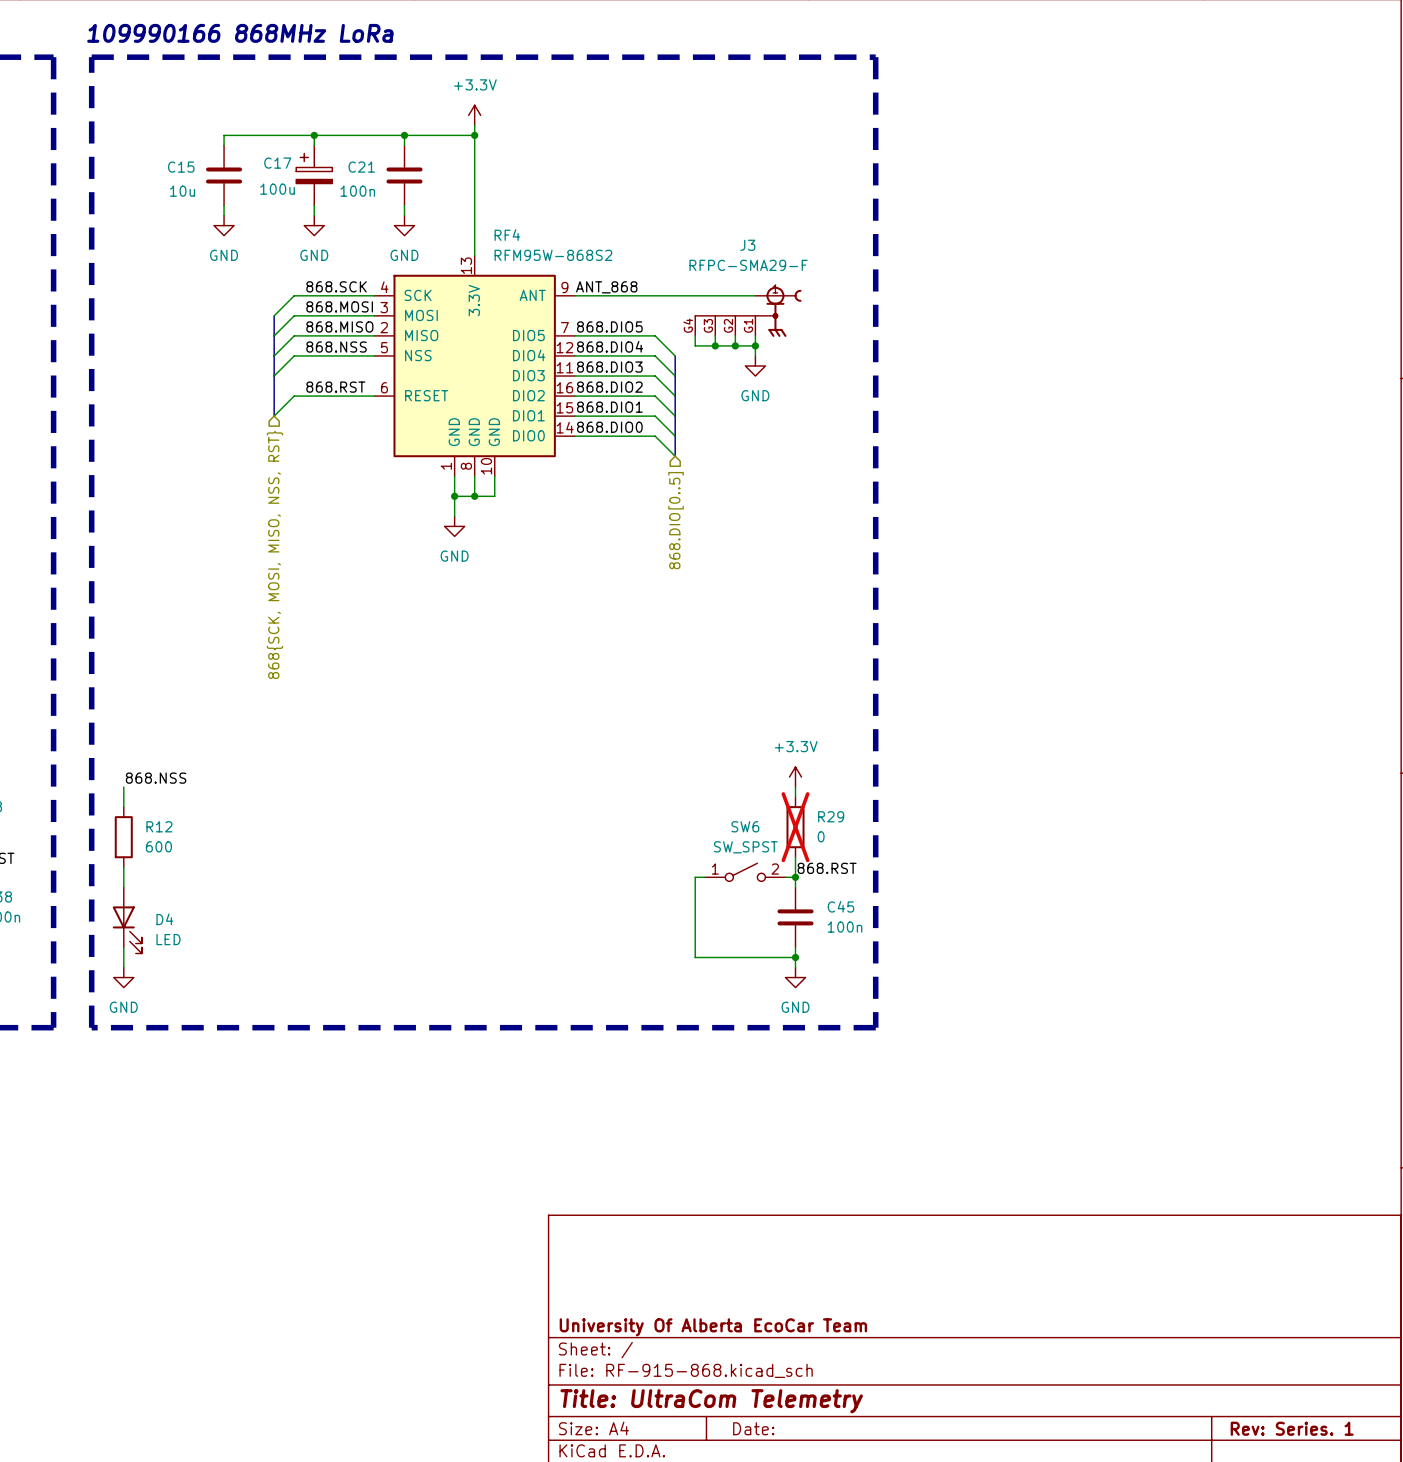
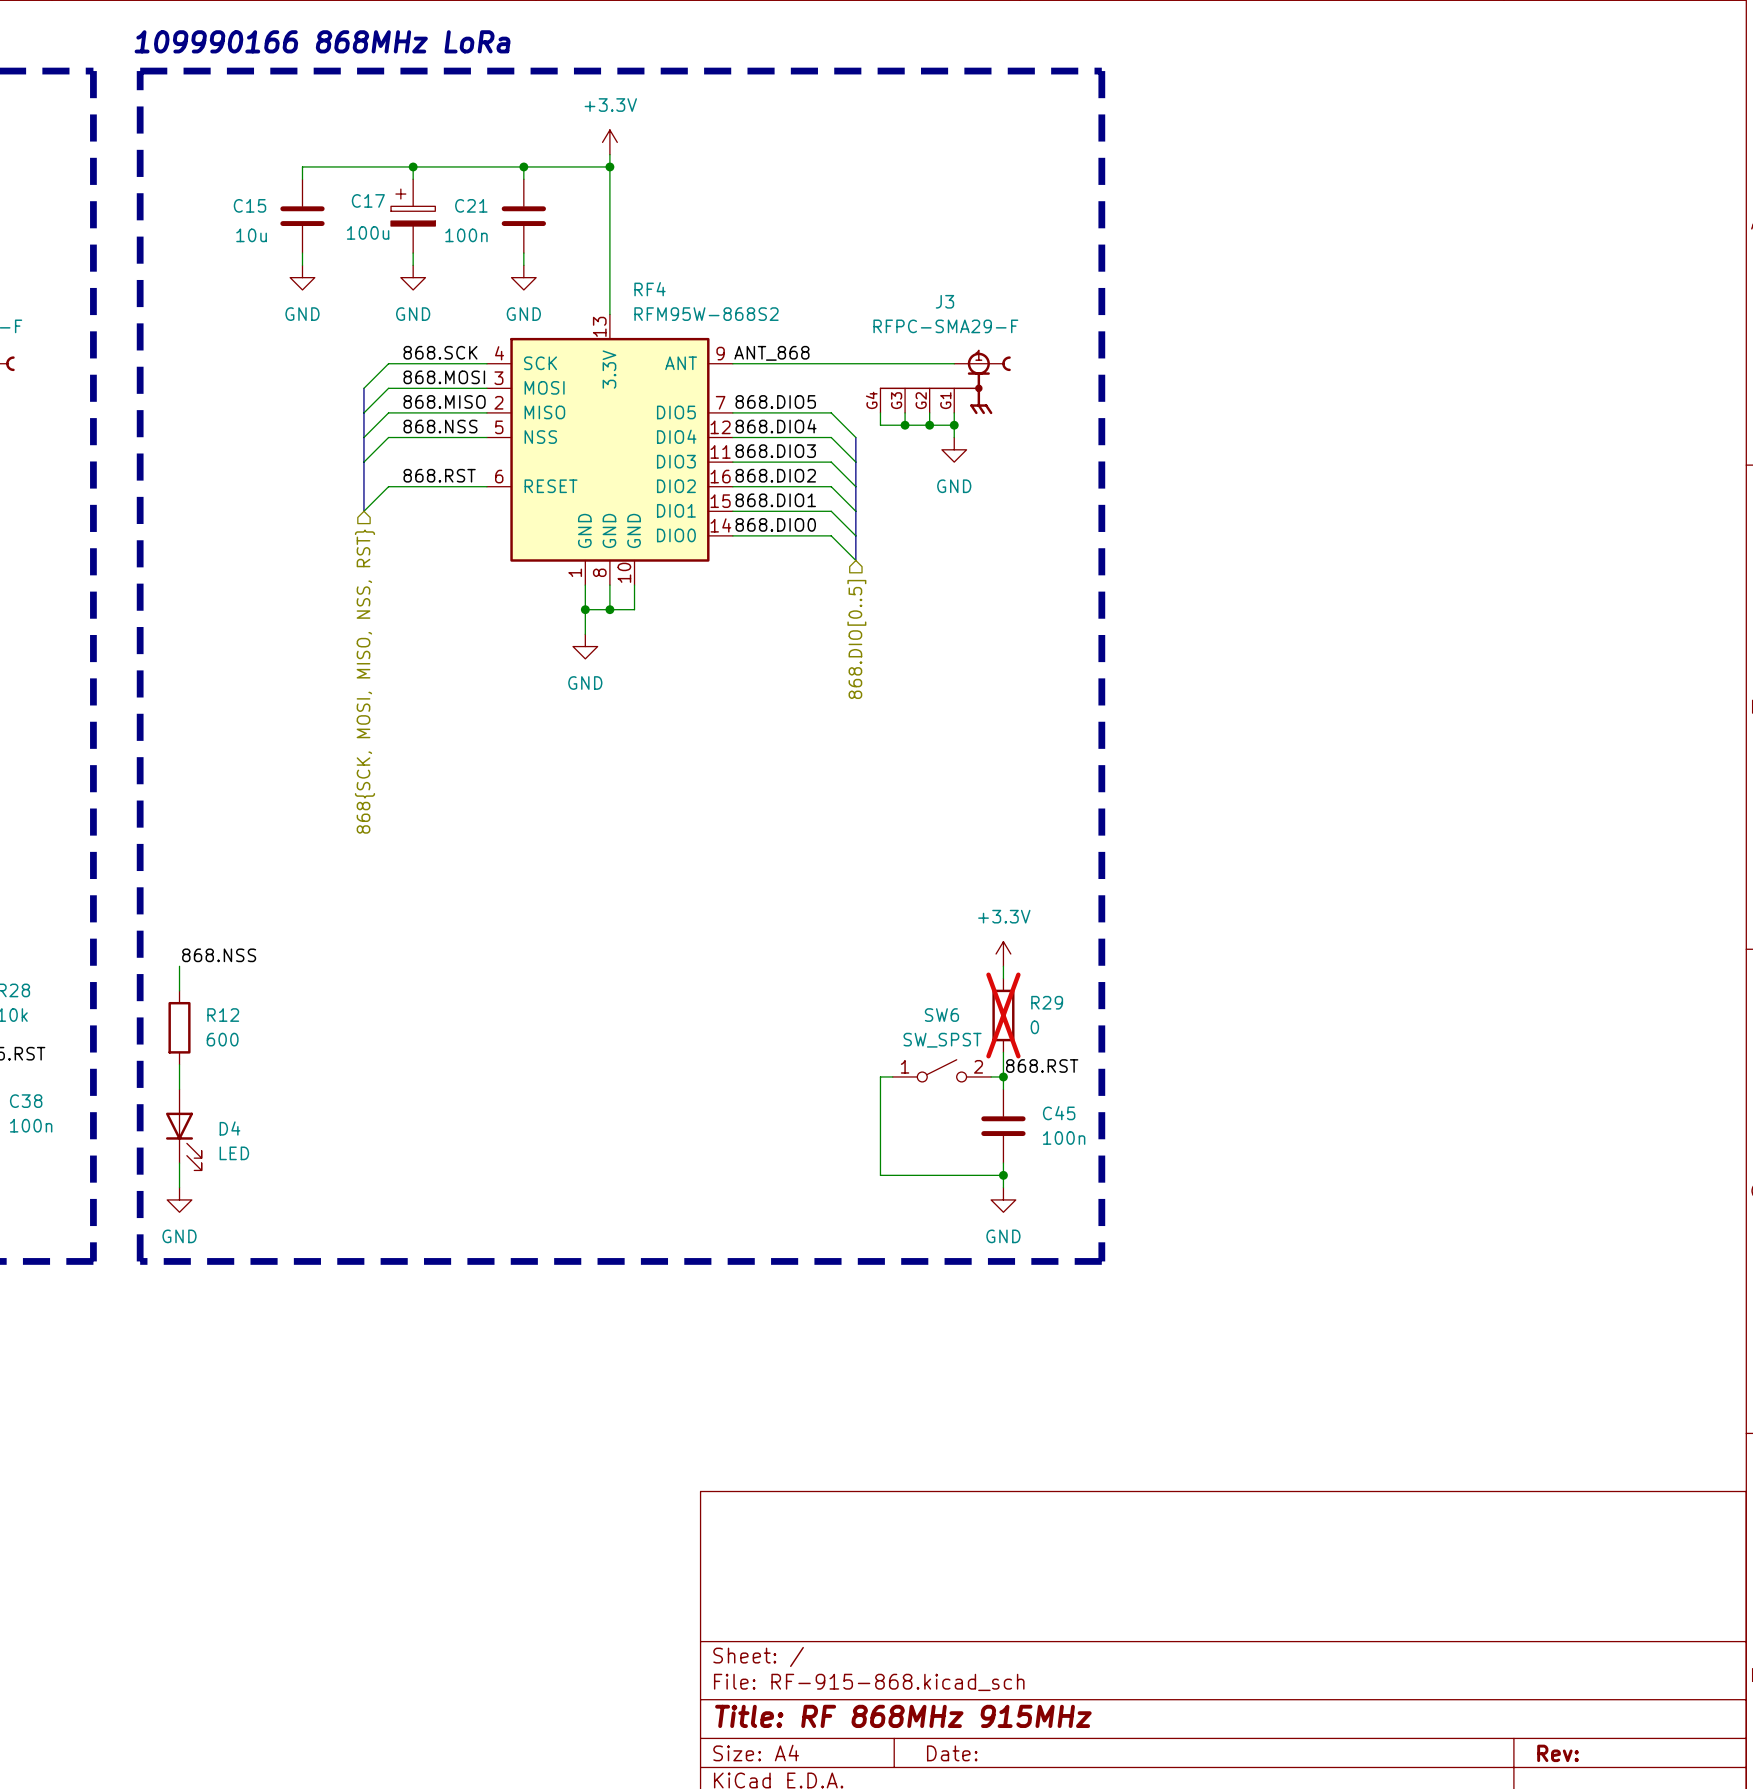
title block: University Of Alberta EcoCar Team (713, 1327) -> none
title block: Title: UltraCom Telemetry (711, 1401) -> Title: RF 868MHz 915MHz (903, 1716)
title block: Rev: Series. 1 (1292, 1428) -> Rev: (1558, 1753)

